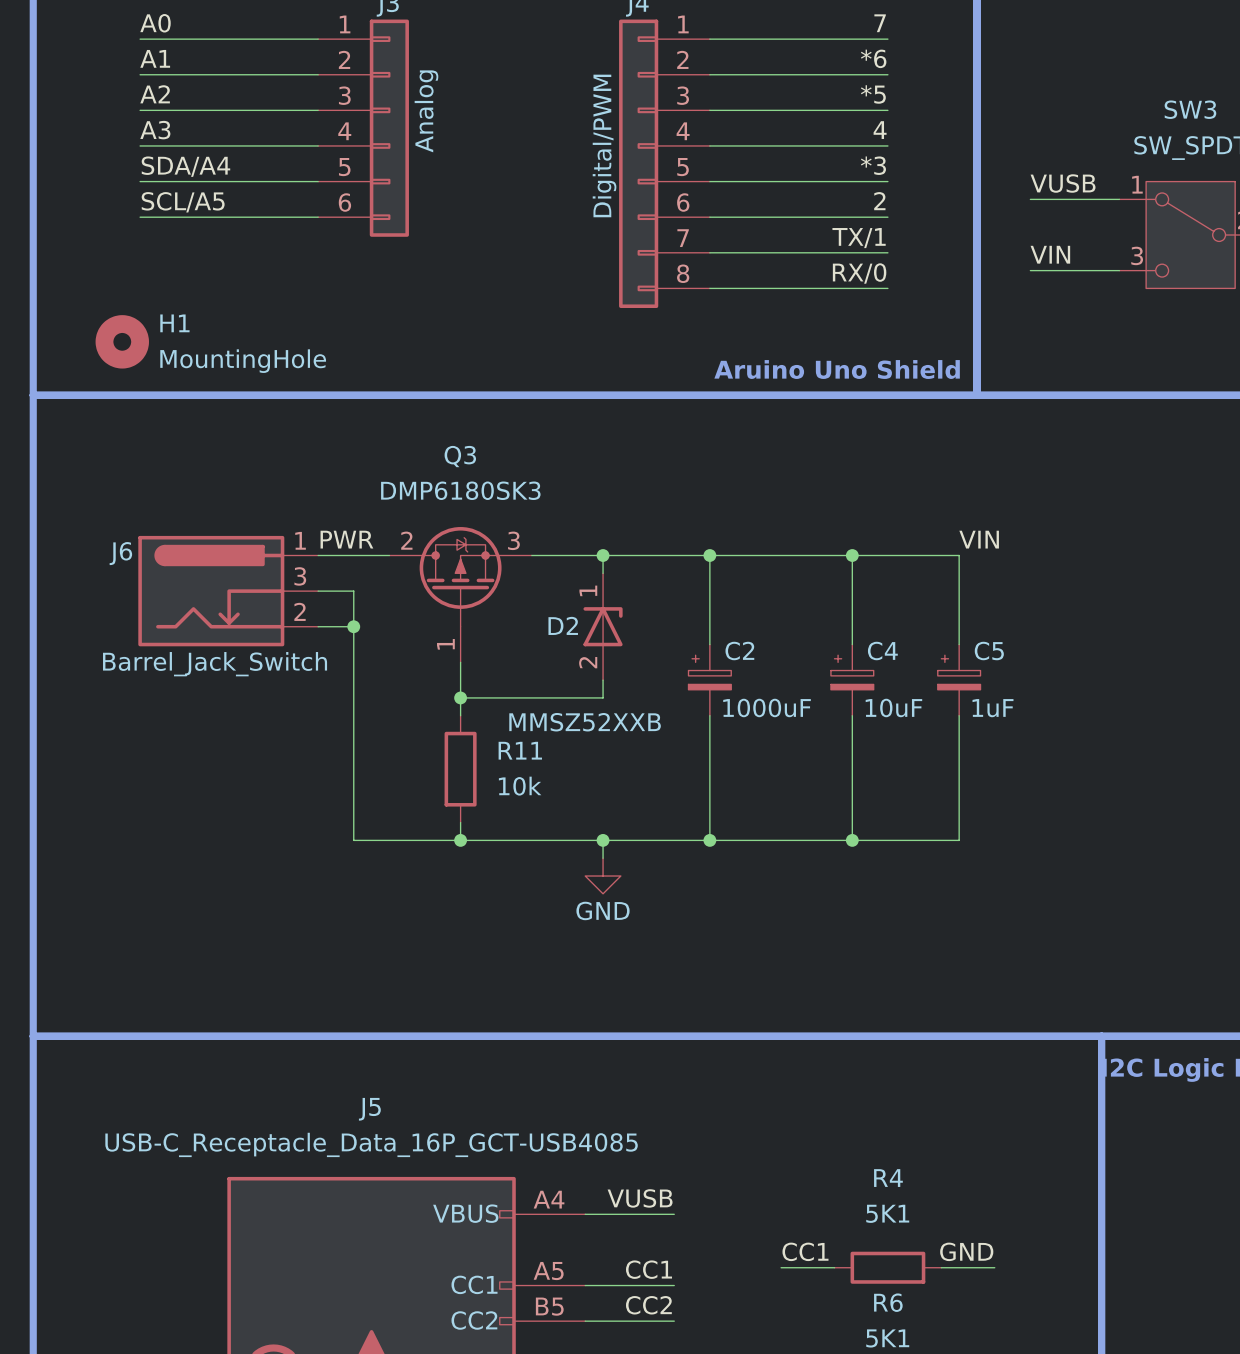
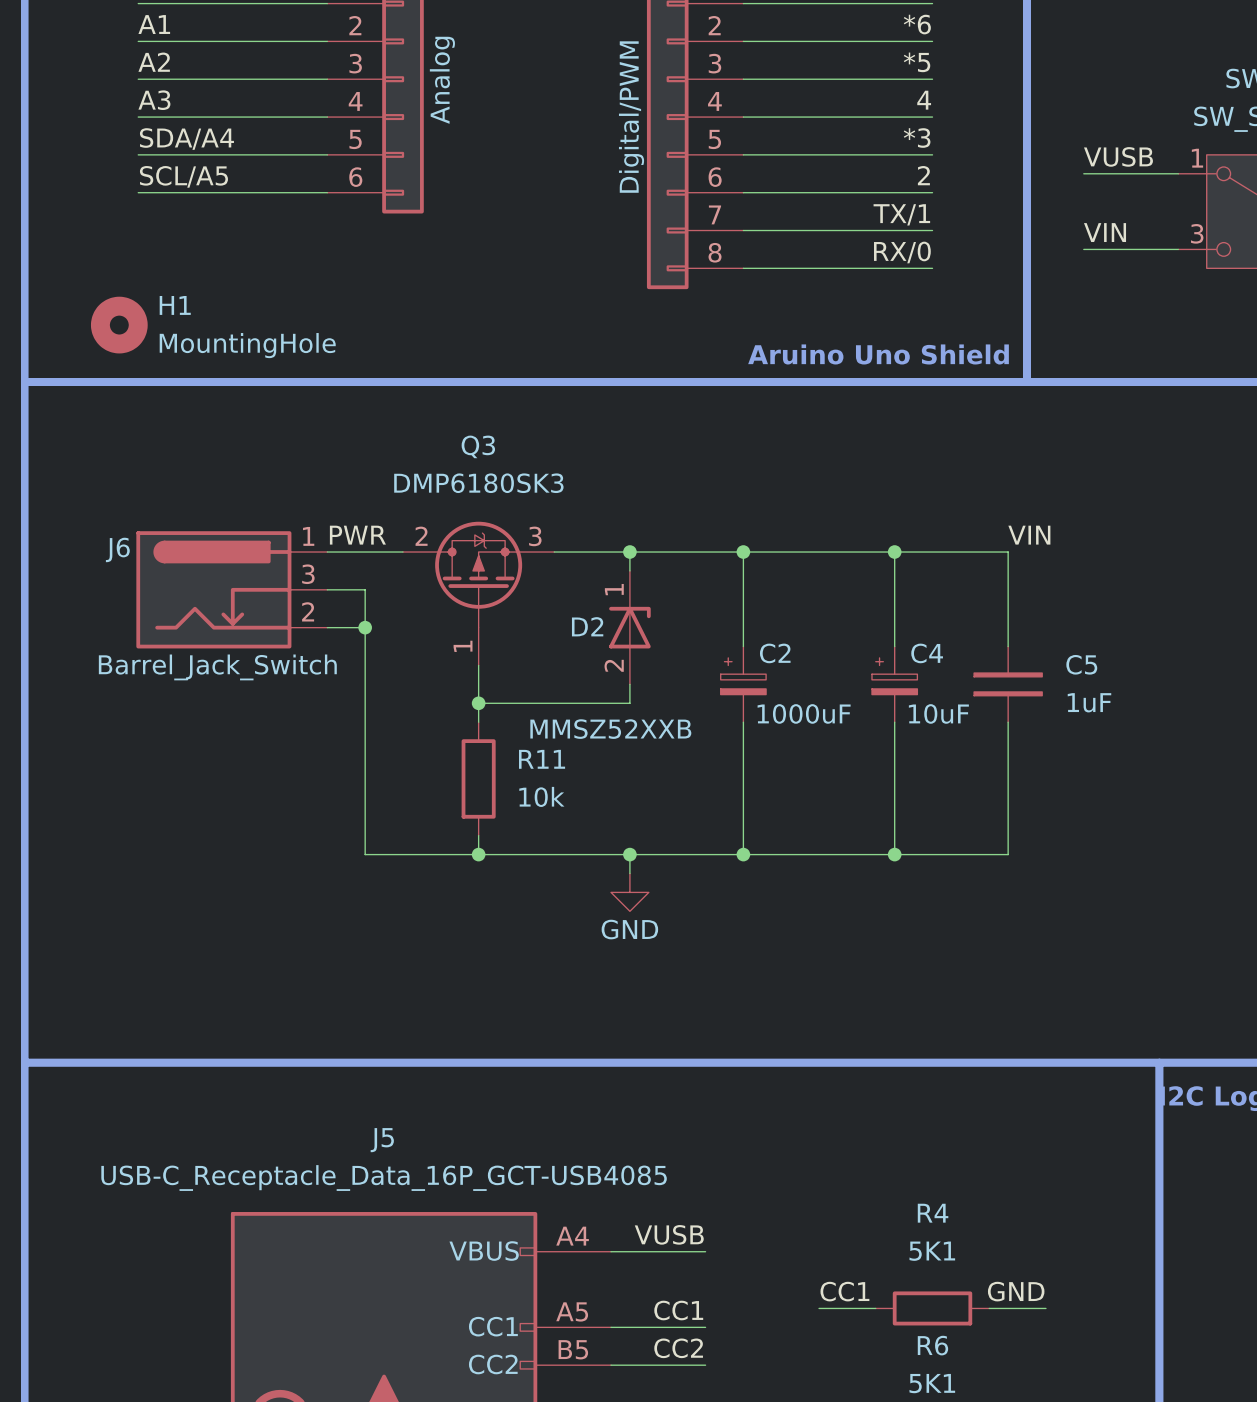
C5 symbol: [937, 644, 981, 716] -> [974, 646, 1043, 723]
C5 name position: C5 (989, 651) -> C5 (1081, 664)
C5 value position: 1uF (993, 708) -> 1uF (1089, 702)

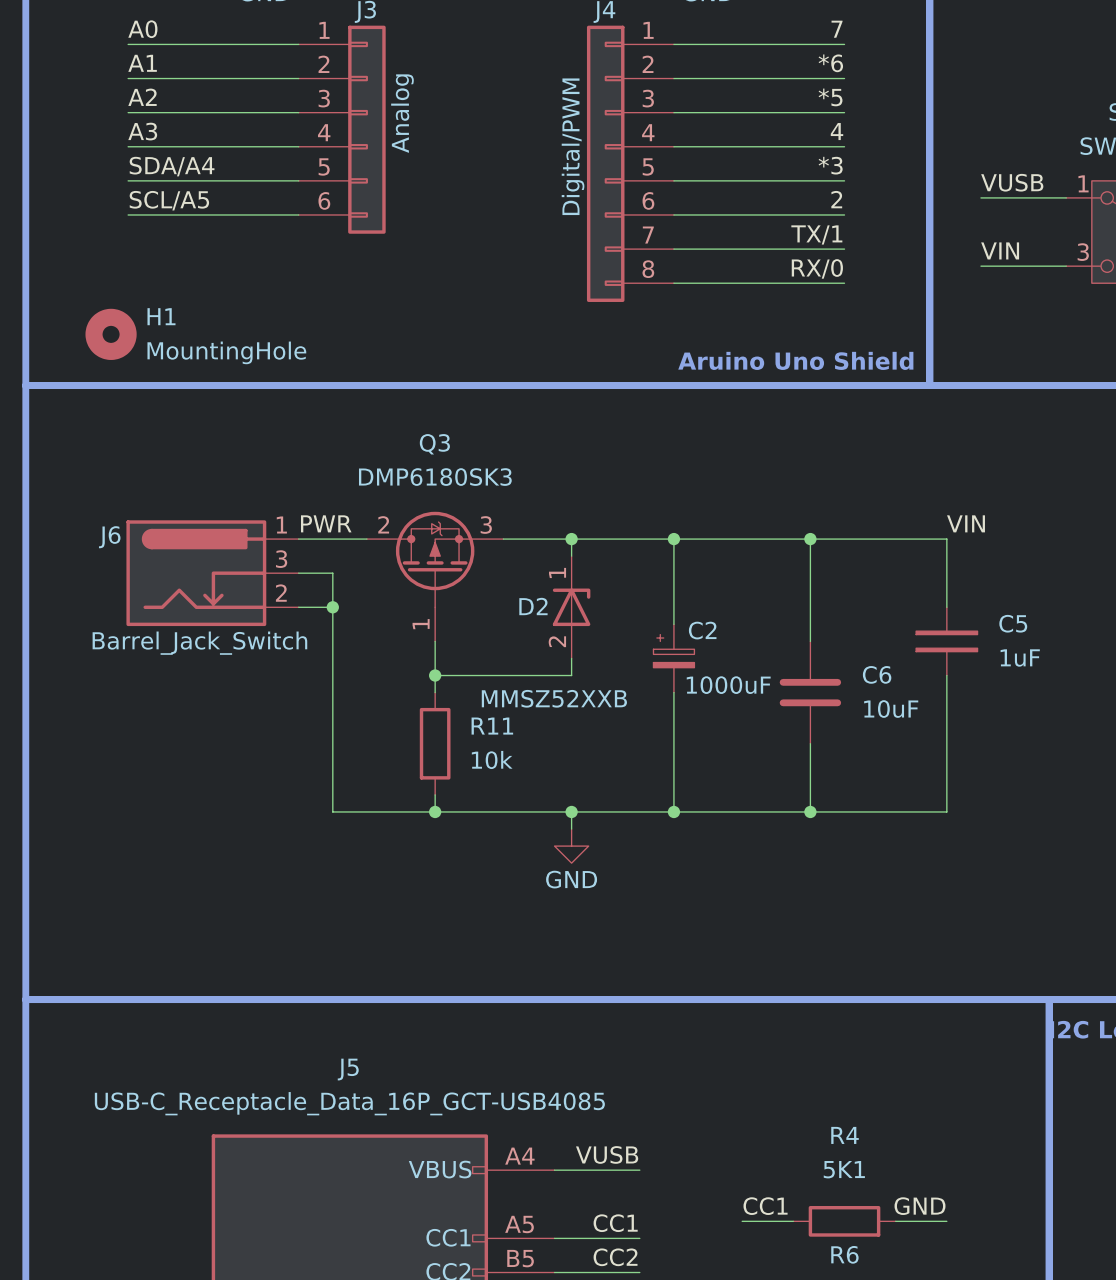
label position: VIN (1029, 535) -> VIN (966, 523)
wire: (1008, 552) (1008, 646) -> (912, 539) (946, 539) (946, 607)
C4: 10uF (894, 684) -> none
C5 position: (1008, 684) -> (946, 641)
C6: none -> 10uF (810, 692)
wire: (1008, 722) (1008, 854) -> (946, 675) (946, 811) (912, 811)

